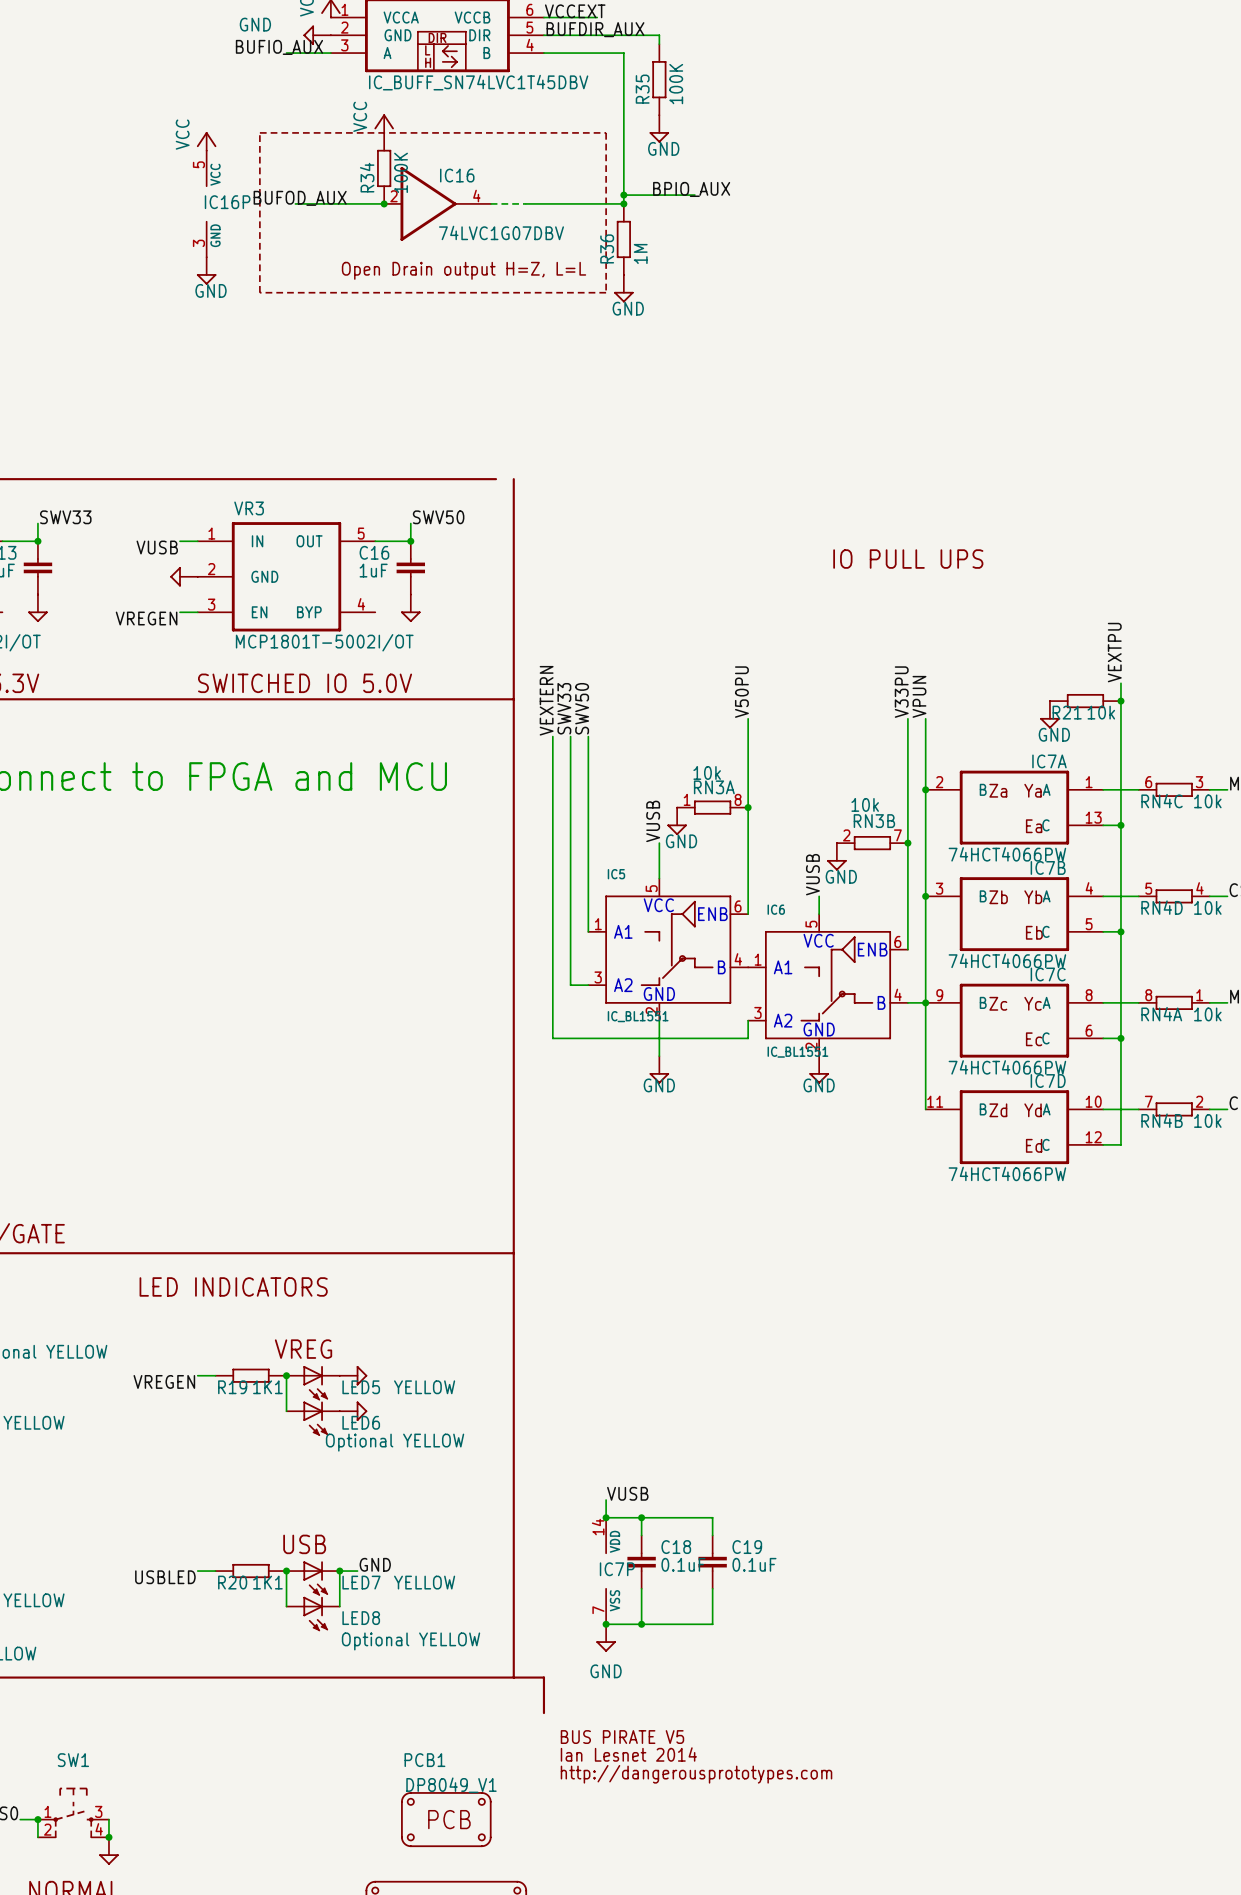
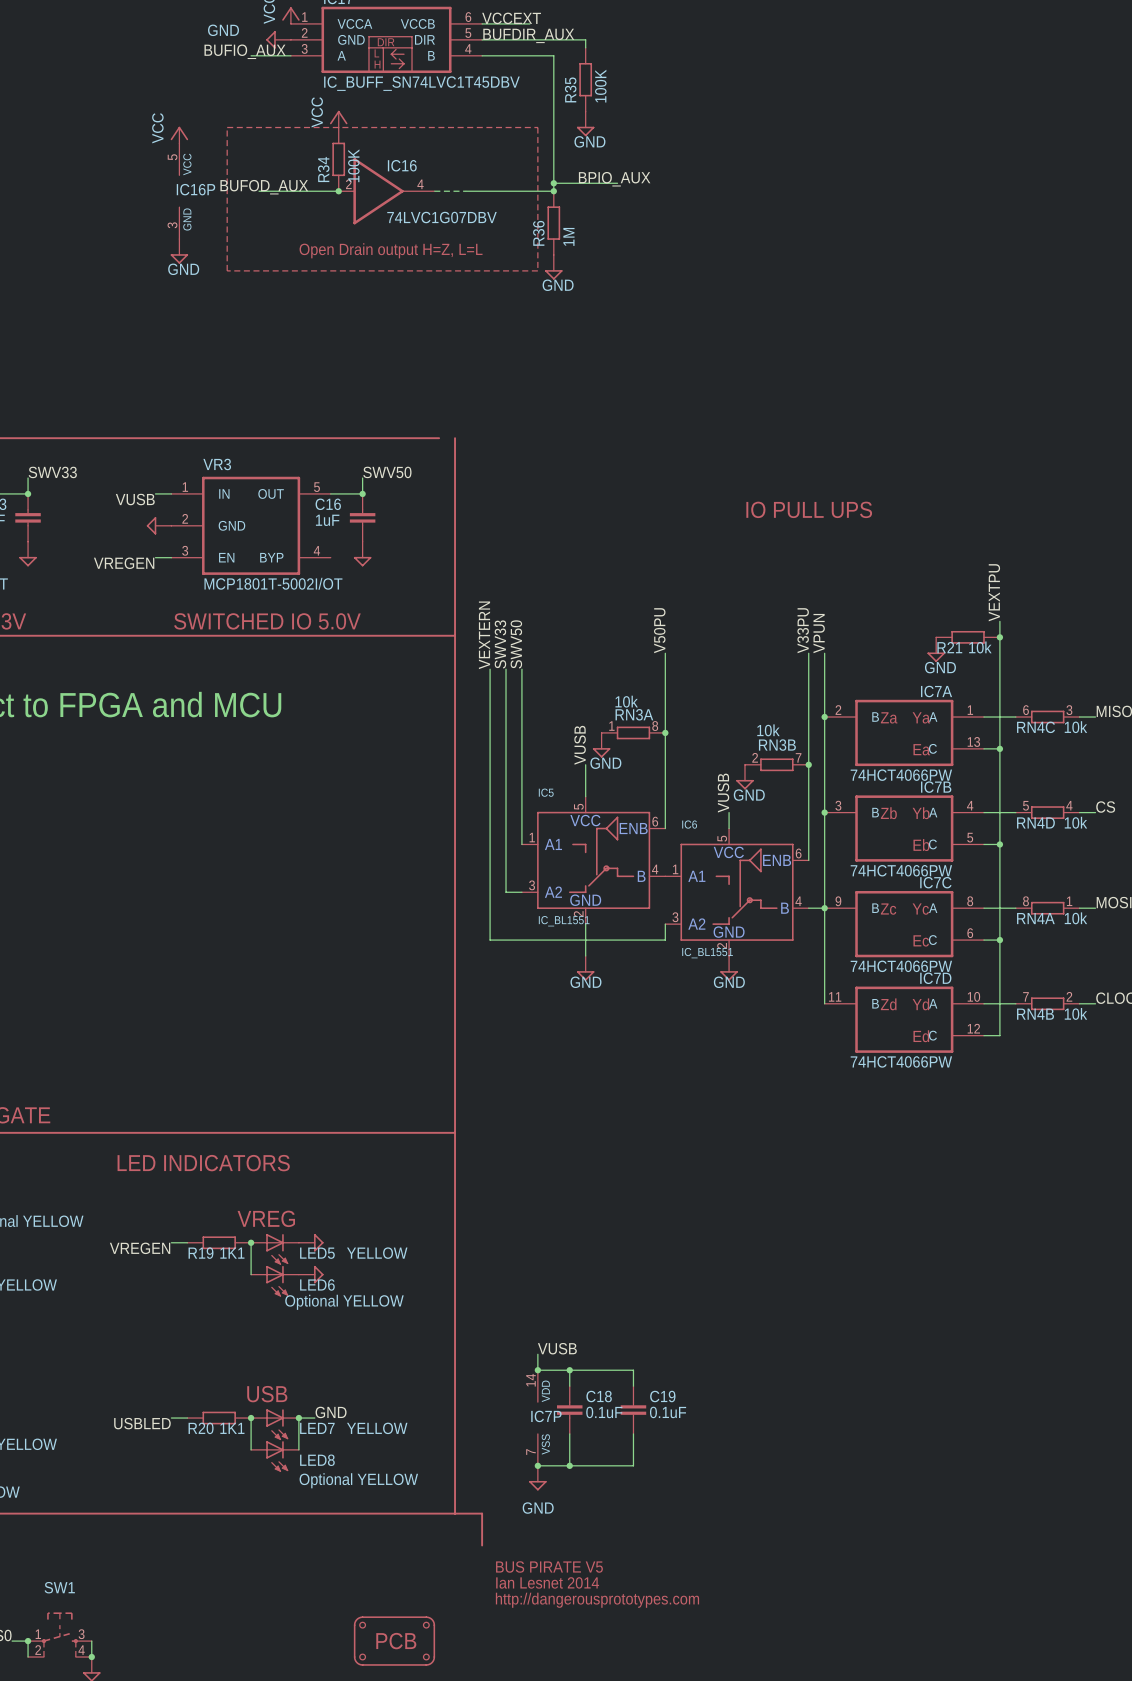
PCB1 name: PCB1 (424, 1760) -> none
PCB1 text: DP8049_V1 (451, 1785) -> none

